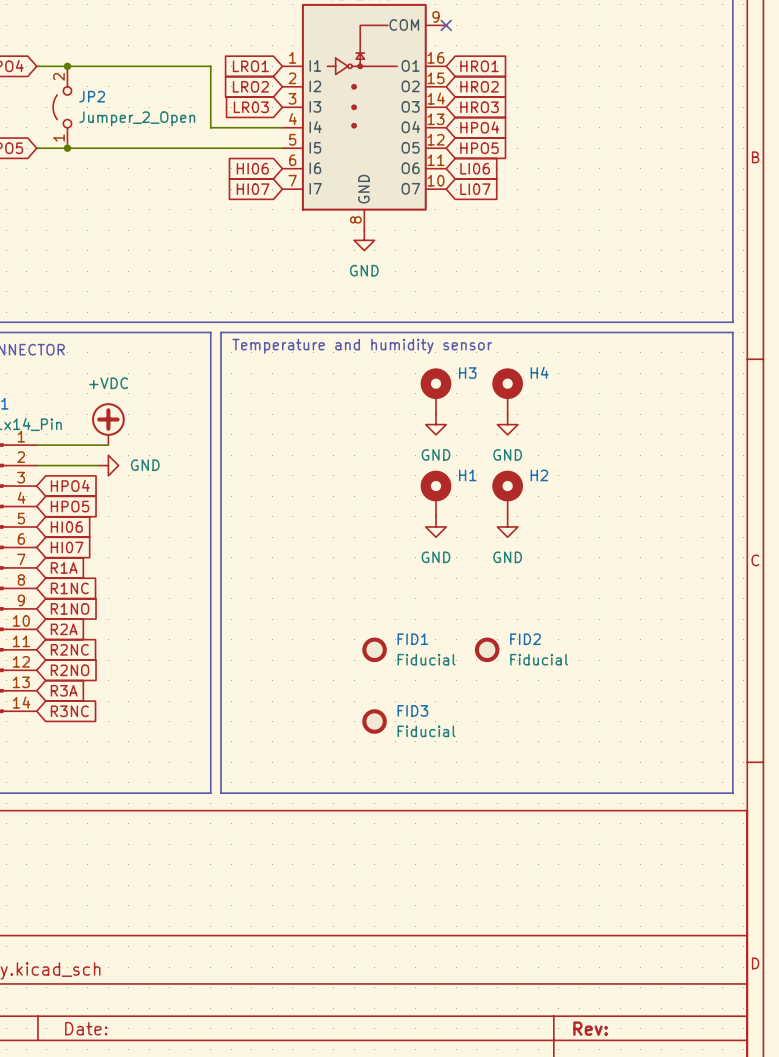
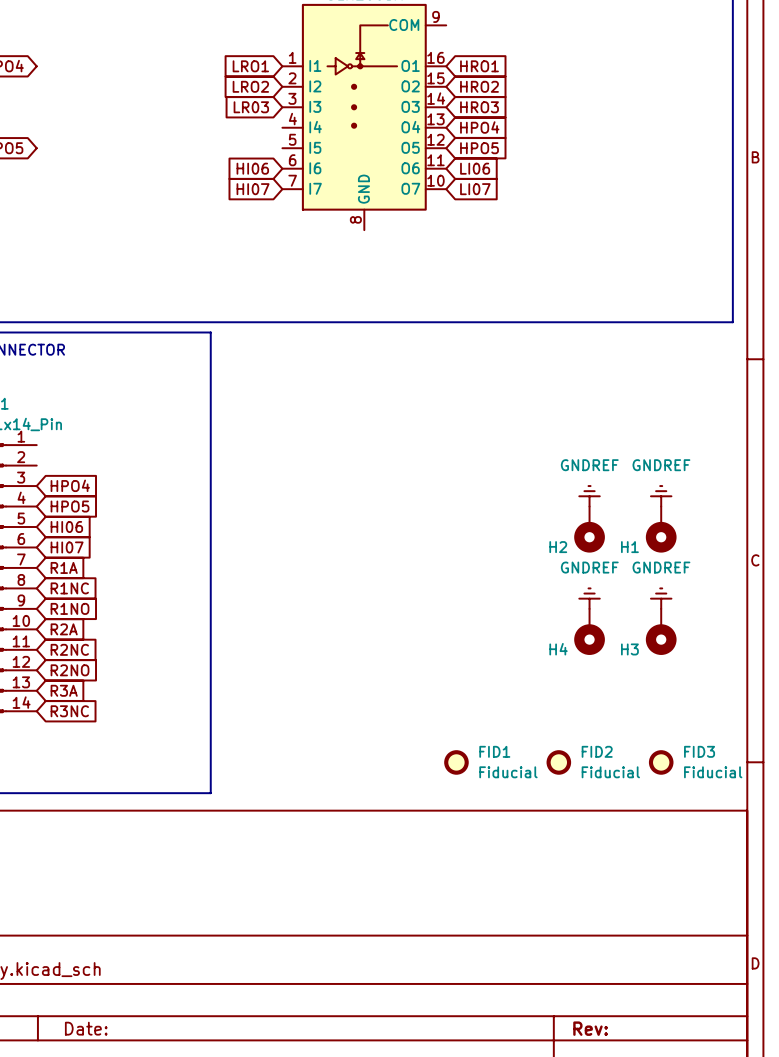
no-connect mark: (446, 25) -> none
wire: (36, 66) (210, 66) (210, 127) (282, 127) -> none
junction: (67, 66) -> none
JP2: Jumper_2_Open (62, 107) -> none
wire: (36, 148) (282, 148) -> none
junction: (67, 148) -> none
power symbol: GND (364, 240) -> none
line: (221, 332) (732, 332) (732, 793) (221, 793) (221, 332) -> none
text: Temperature and humidity sensor (362, 346) -> none
H3 rotation: 0° (435, 383) -> 180° (661, 639)
H4 rotation: 0° (507, 383) -> 180° (589, 639)
H3 position: (435, 391) -> (661, 631)
H4 position: (507, 391) -> (589, 631)
power symbol: +VDC (108, 424) -> none
power symbol: GND (435, 424) -> none
power symbol: GND (507, 424) -> none
wire: (36, 445) (108, 445) -> none
wire: (36, 465) (98, 465) -> none
power symbol: GND (108, 465) -> none
H1 rotation: 0° (435, 486) -> 180° (661, 537)
H2 rotation: 0° (507, 486) -> 180° (589, 537)
H1 position: (435, 493) -> (661, 529)
H2 position: (507, 493) -> (589, 529)
power symbol: none -> GNDREF (589, 496)
power symbol: none -> GNDREF (661, 496)
power symbol: GND (435, 527) -> none
power symbol: GND (507, 527) -> none
power symbol: none -> GNDREF (589, 598)
power symbol: none -> GNDREF (661, 598)
FID1 position: (374, 649) -> (456, 762)
FID2 position: (487, 649) -> (558, 762)
FID3 position: (374, 721) -> (661, 762)

